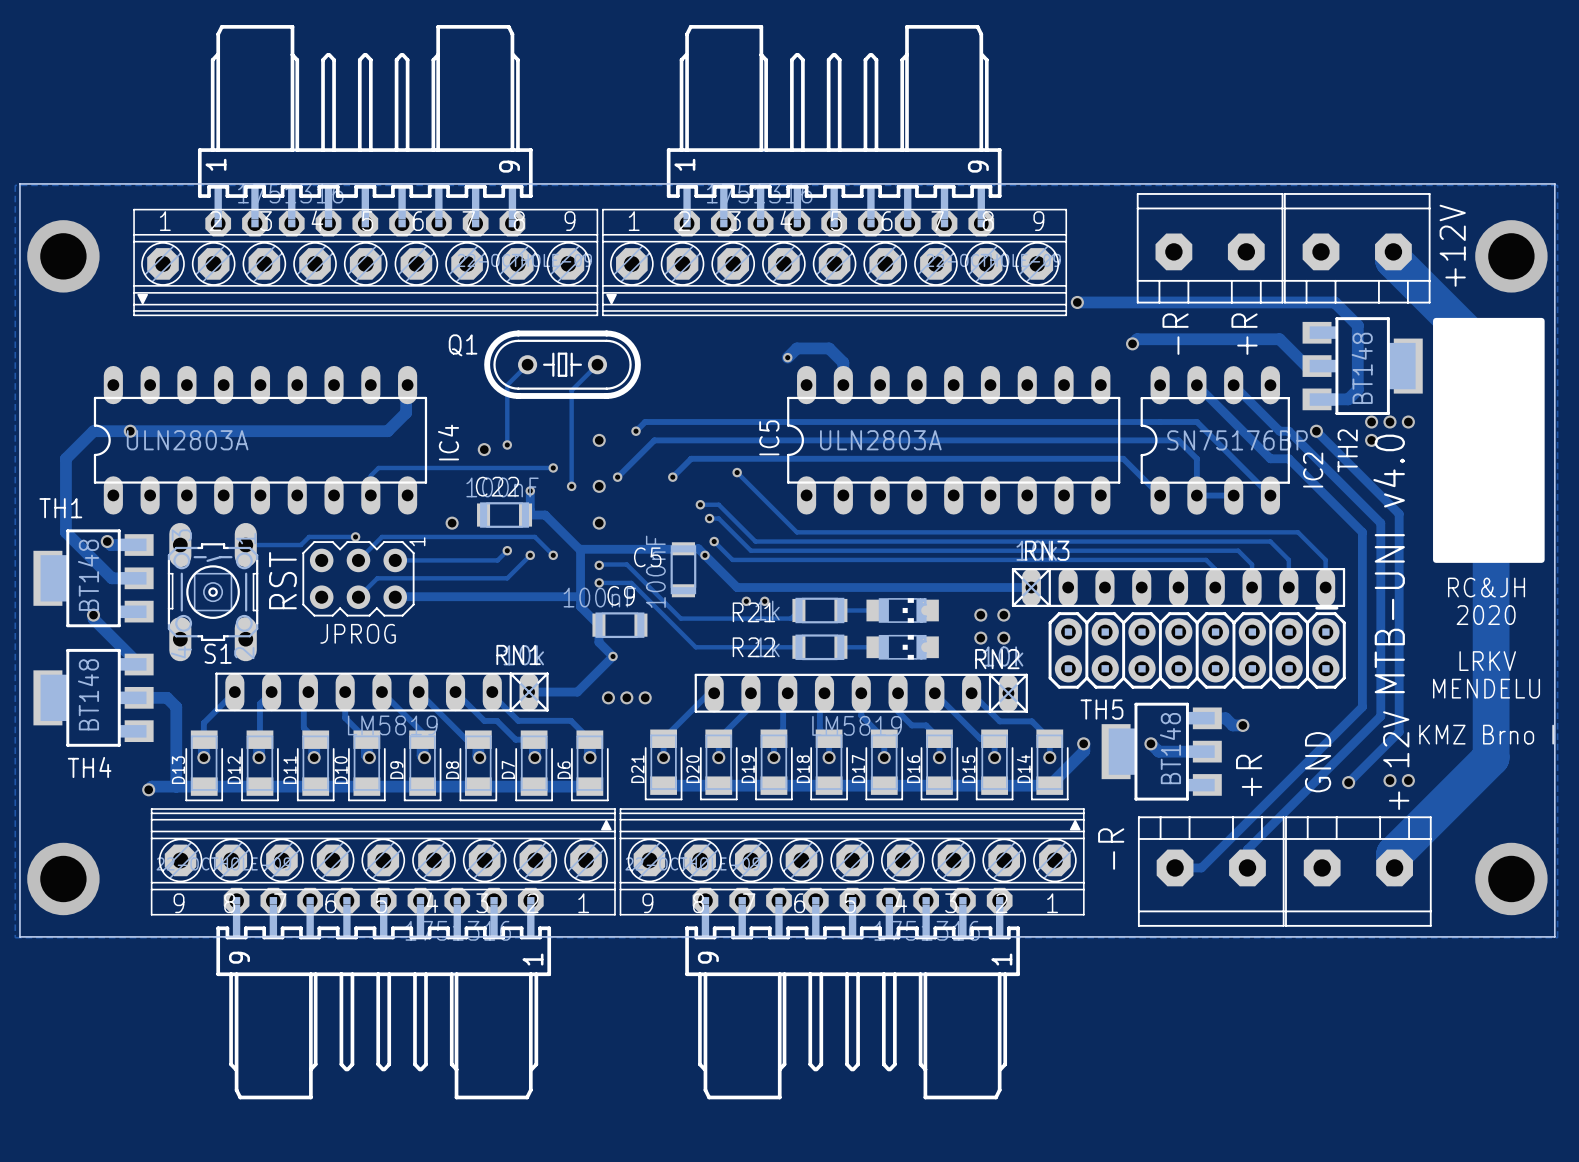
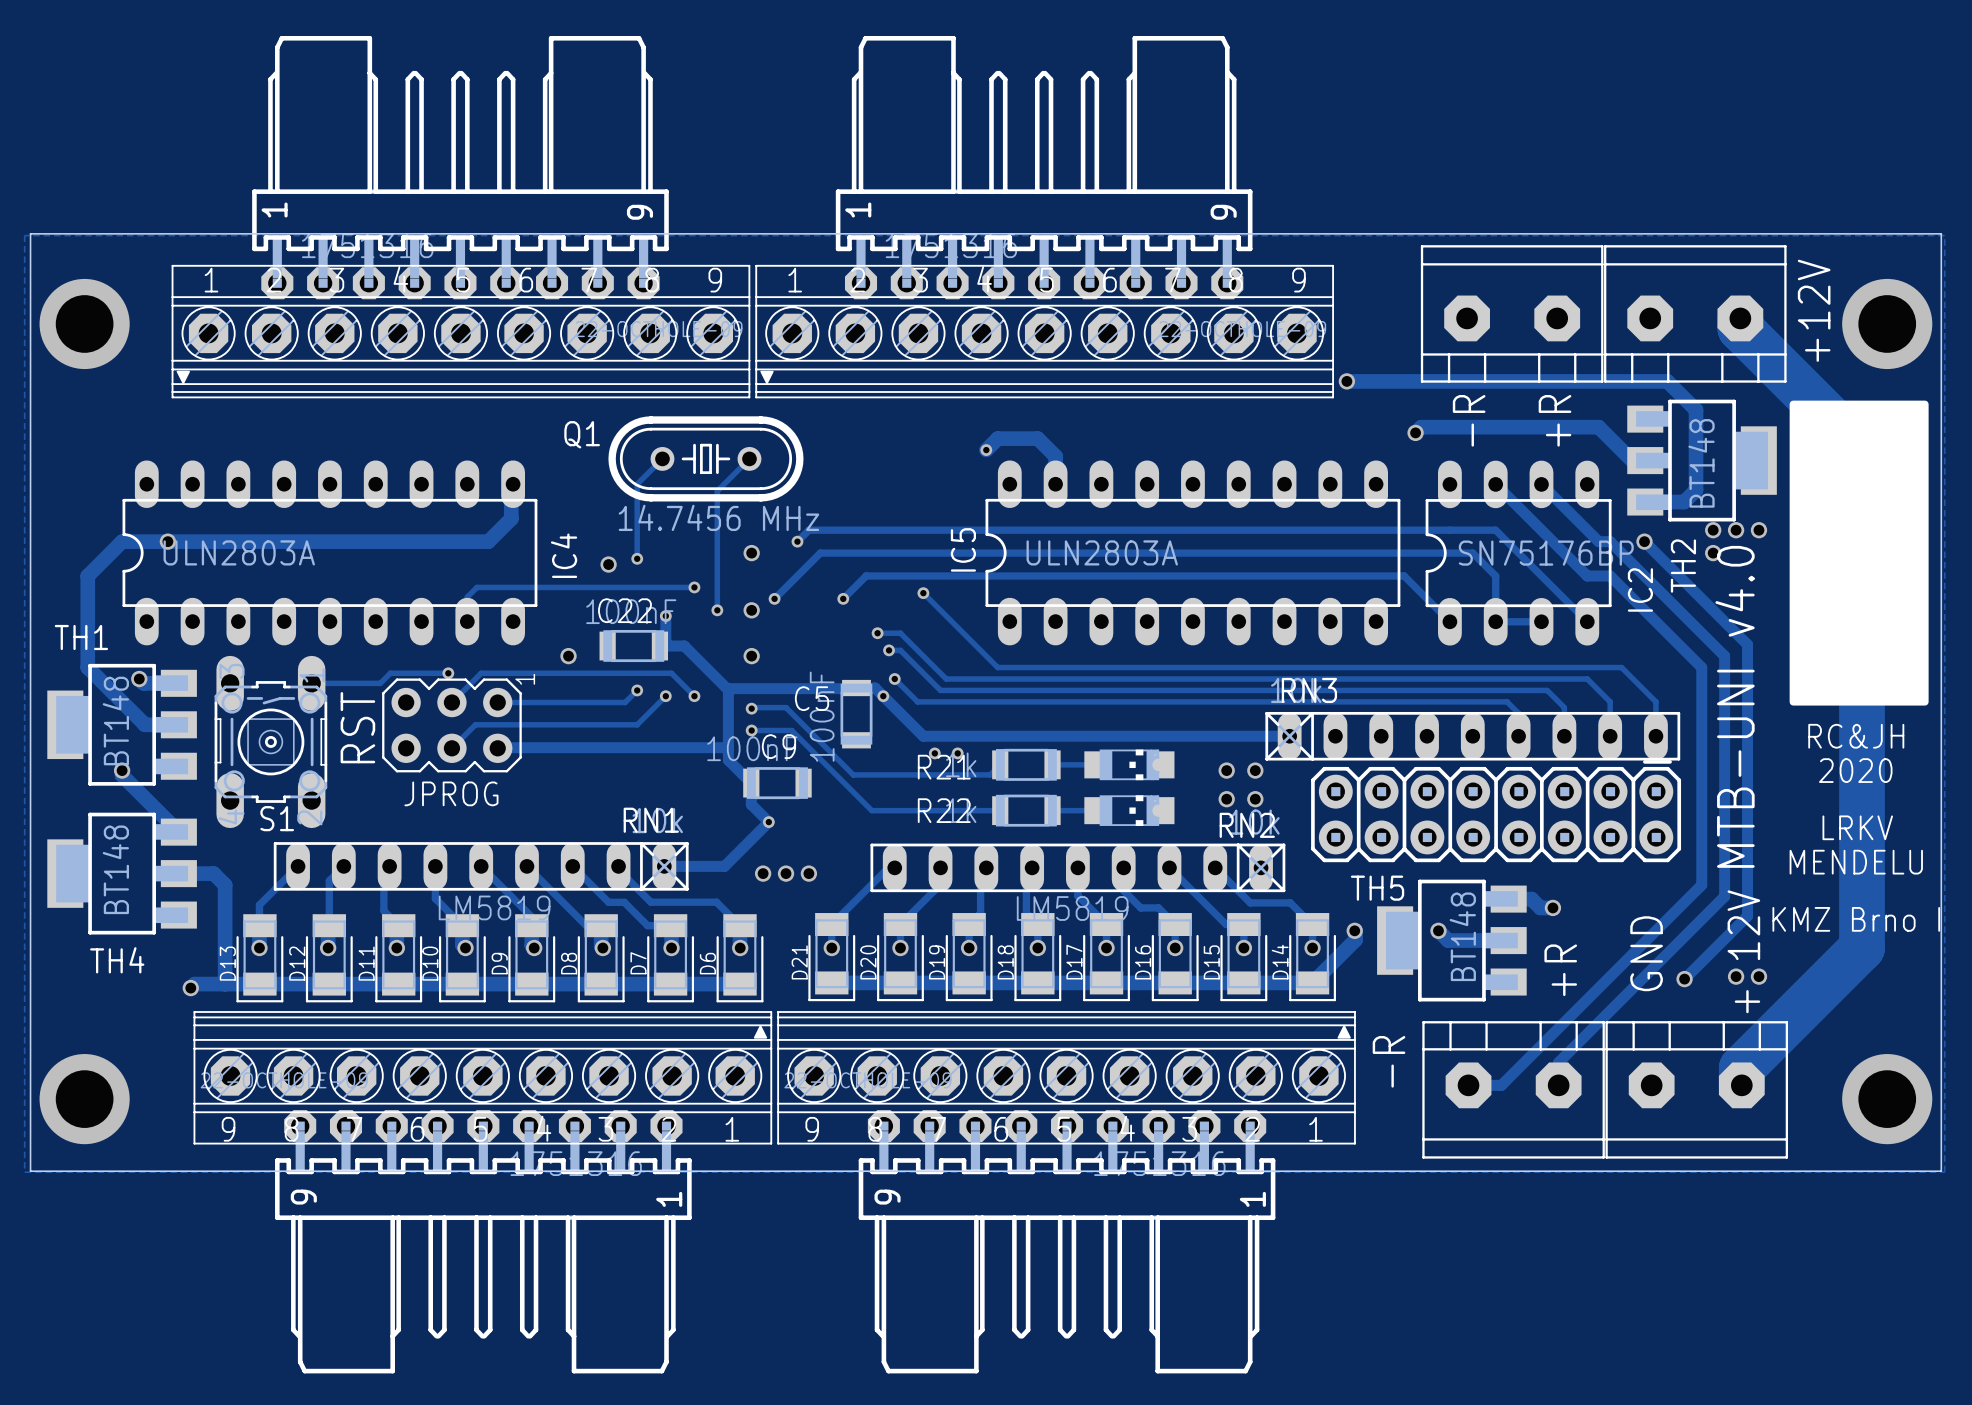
Q1 value: none -> 14.7456 MHz (718, 517)

